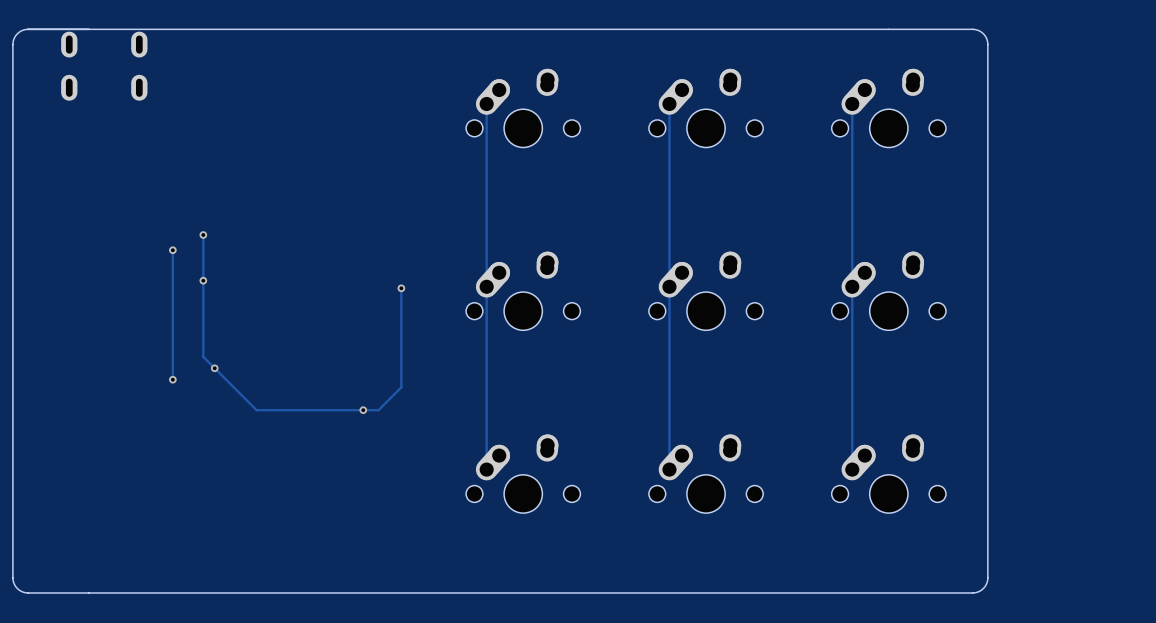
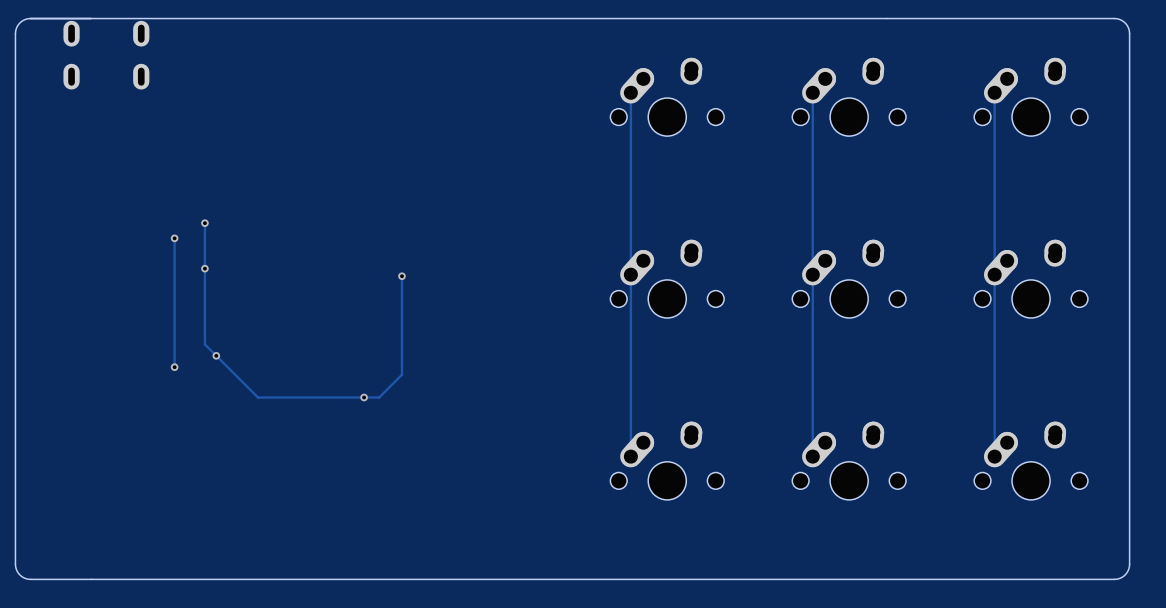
board edge: (972, 29) (983, 33) (987, 44) (987, 577) (983, 588) (972, 592) -> (970, 18) (1116, 18) (1126, 24) (1129, 33) (1129, 568) (1123, 576) (1116, 579) (970, 579)
track: (486, 103) (486, 469) -> (630, 92) (630, 456)
track: (669, 103) (669, 469) -> (812, 92) (812, 456)
track: (852, 103) (852, 469) -> (994, 92) (994, 456)
part: (523, 108) -> none
part position: (706, 108) -> (667, 96)
part position: (888, 108) -> (849, 96)
part: none -> (1031, 96)
part: (523, 290) -> none
part position: (706, 290) -> (667, 278)
part position: (888, 290) -> (849, 278)
part: none -> (1031, 278)
part: (523, 473) -> none
part position: (706, 473) -> (667, 460)
part position: (888, 473) -> (849, 460)
part: none -> (1031, 460)

